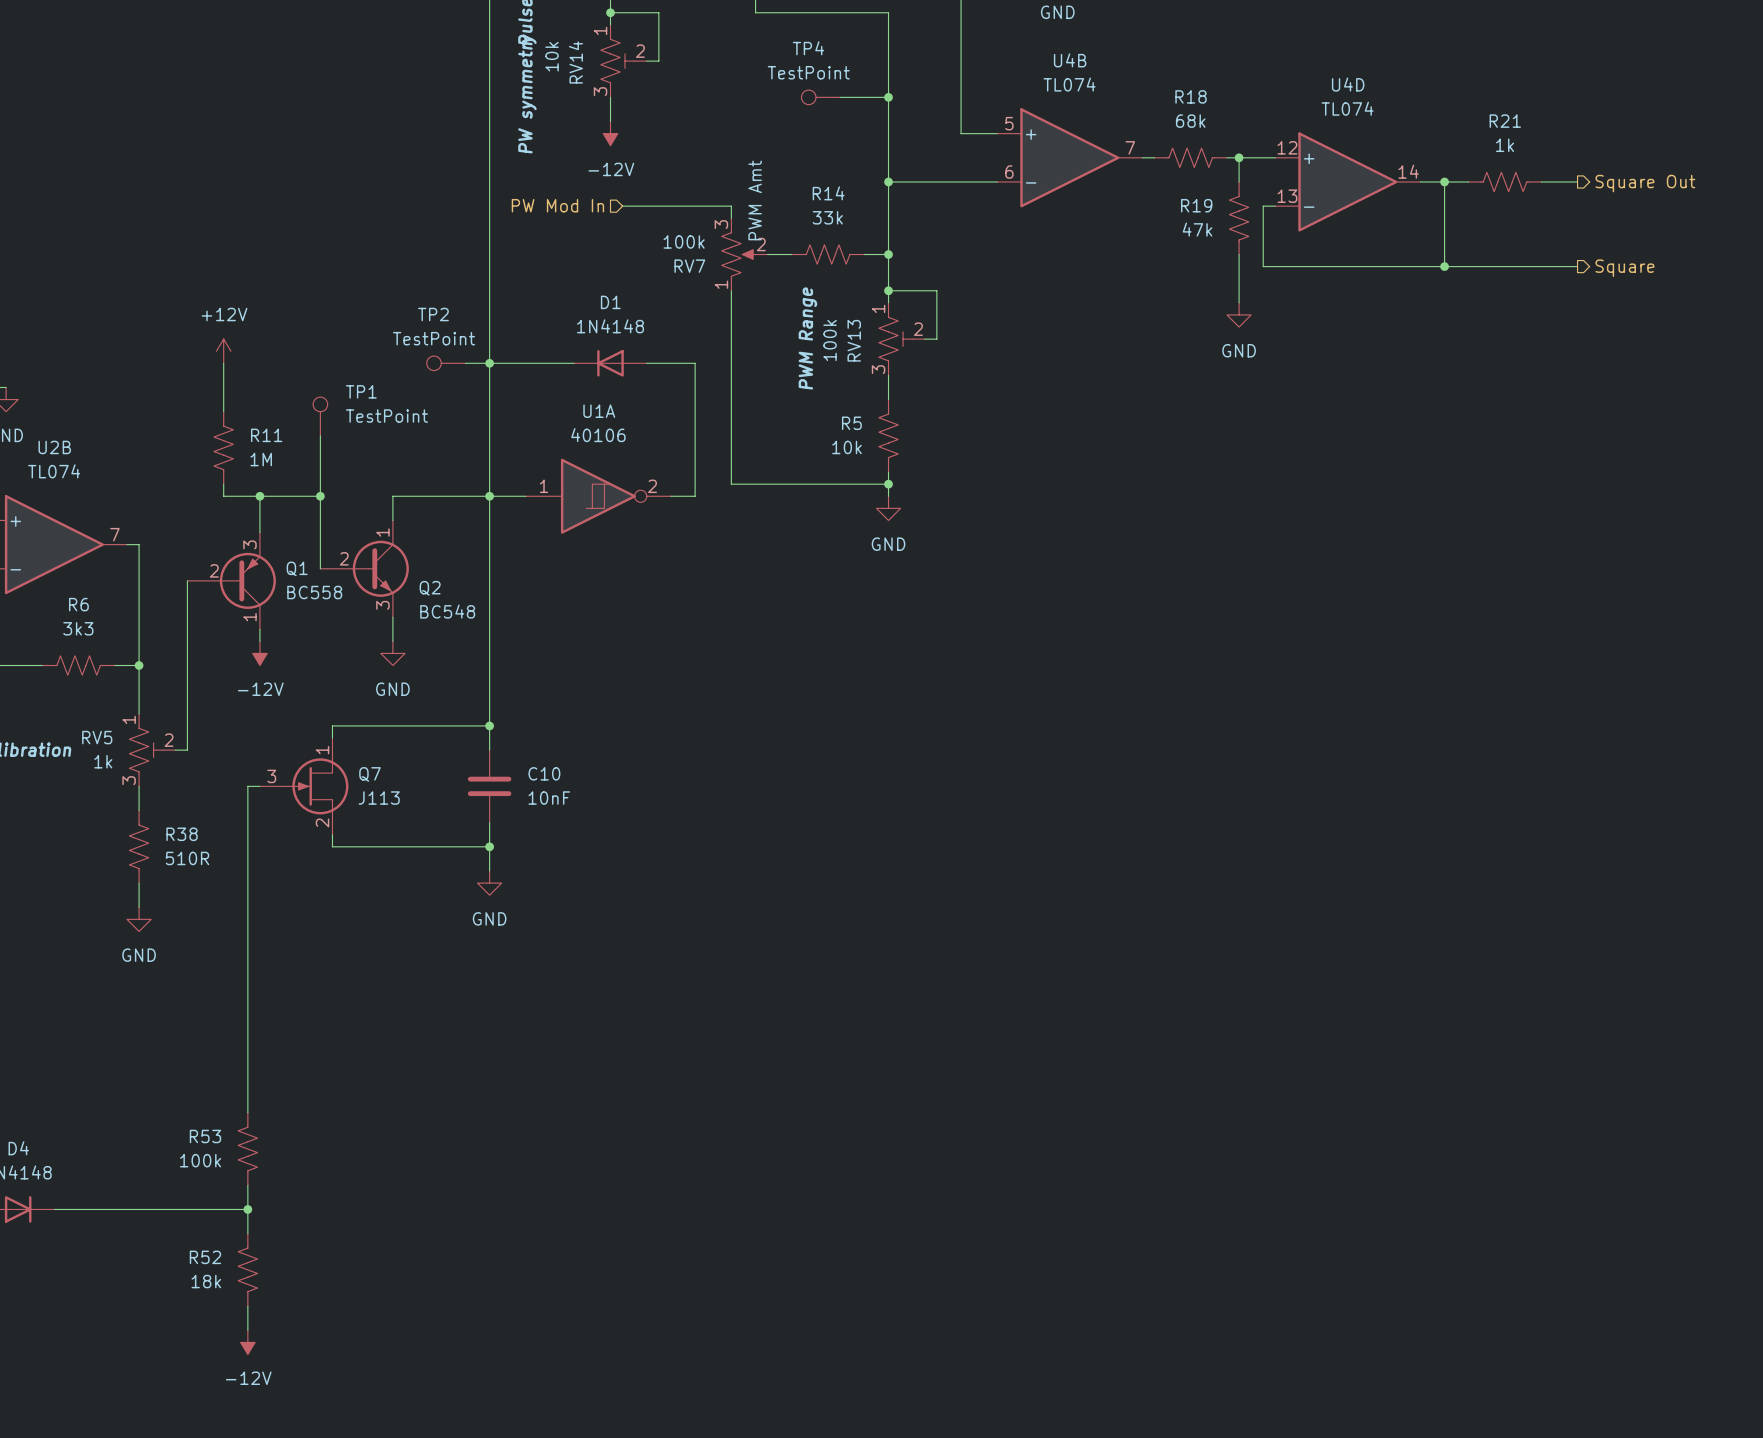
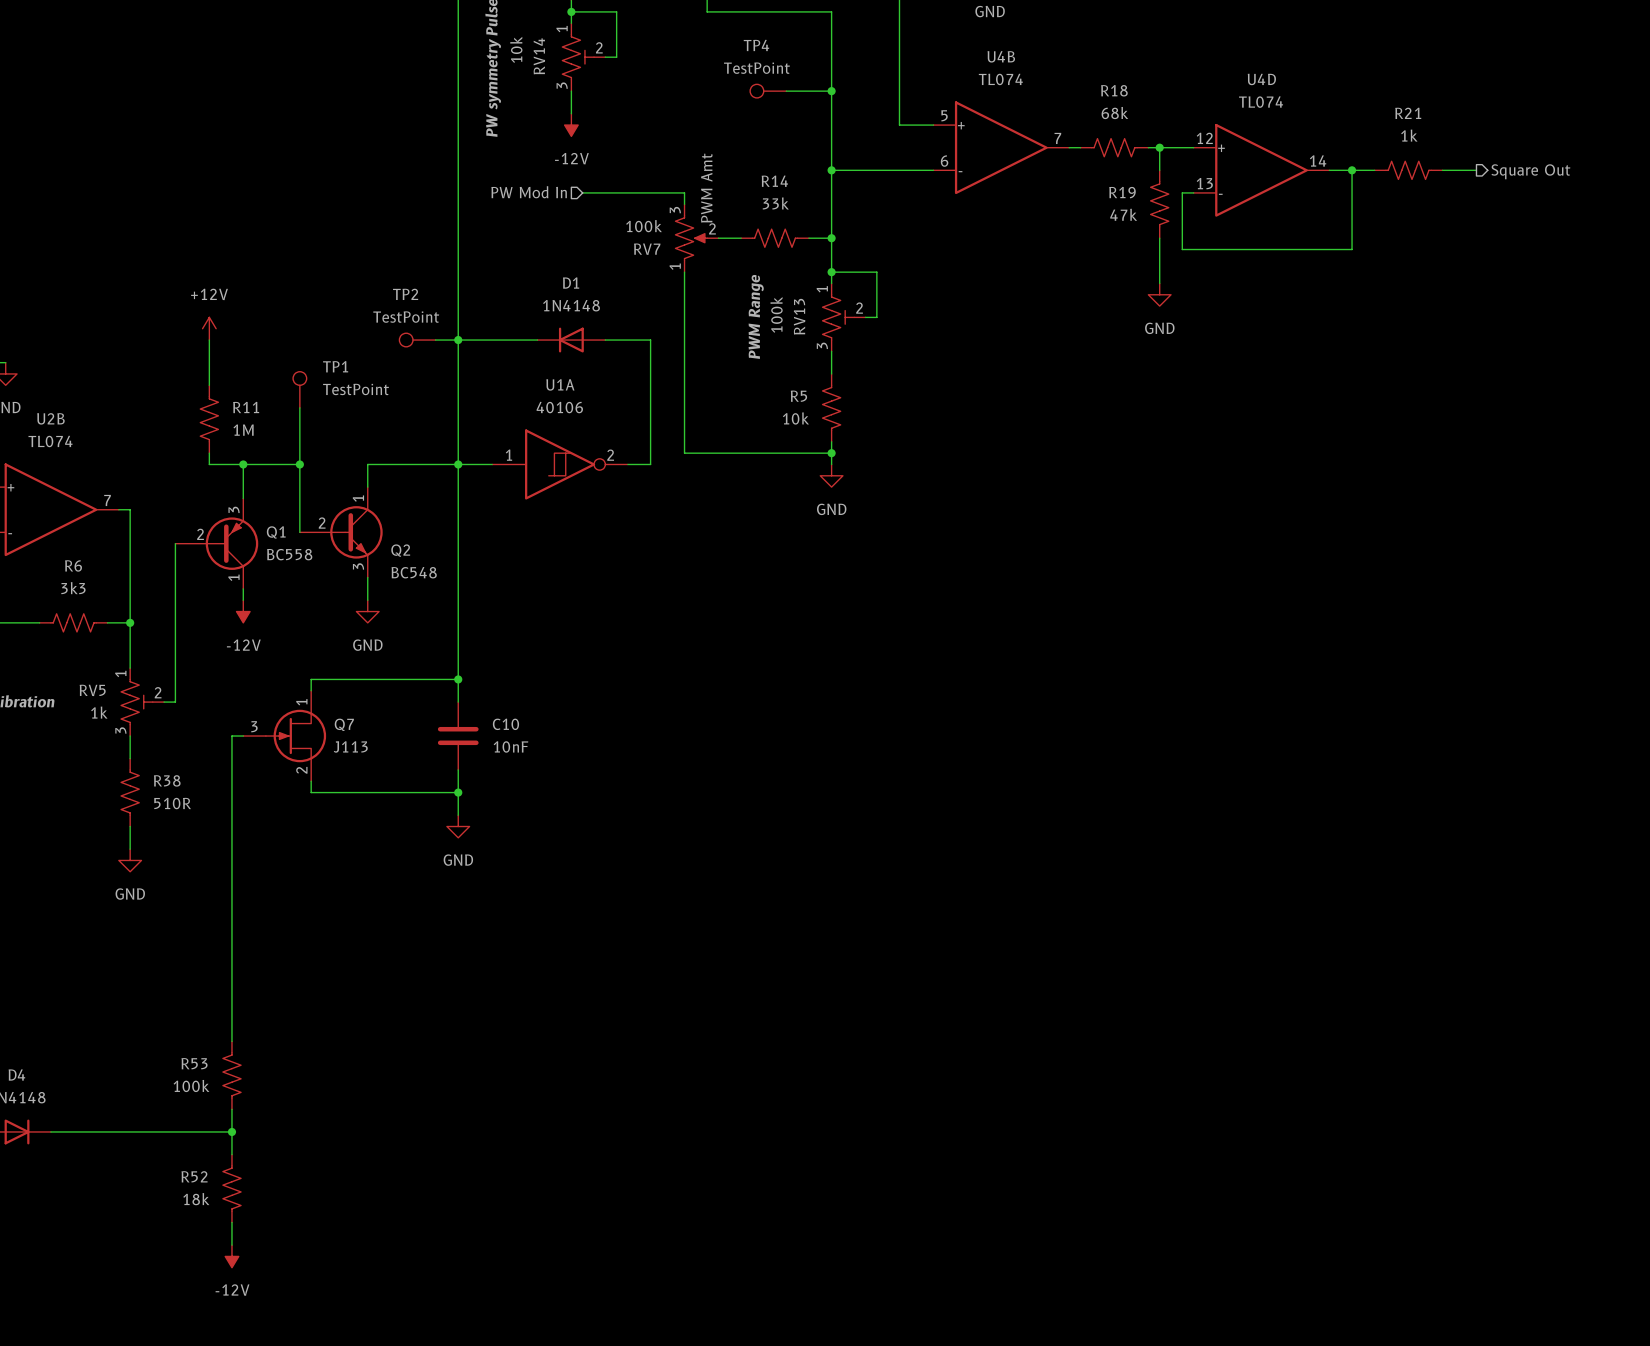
wire: (1444, 266) (1577, 266) -> none
junction: (1444, 266) -> none
hierarchical label: Square (1624, 268) -> none

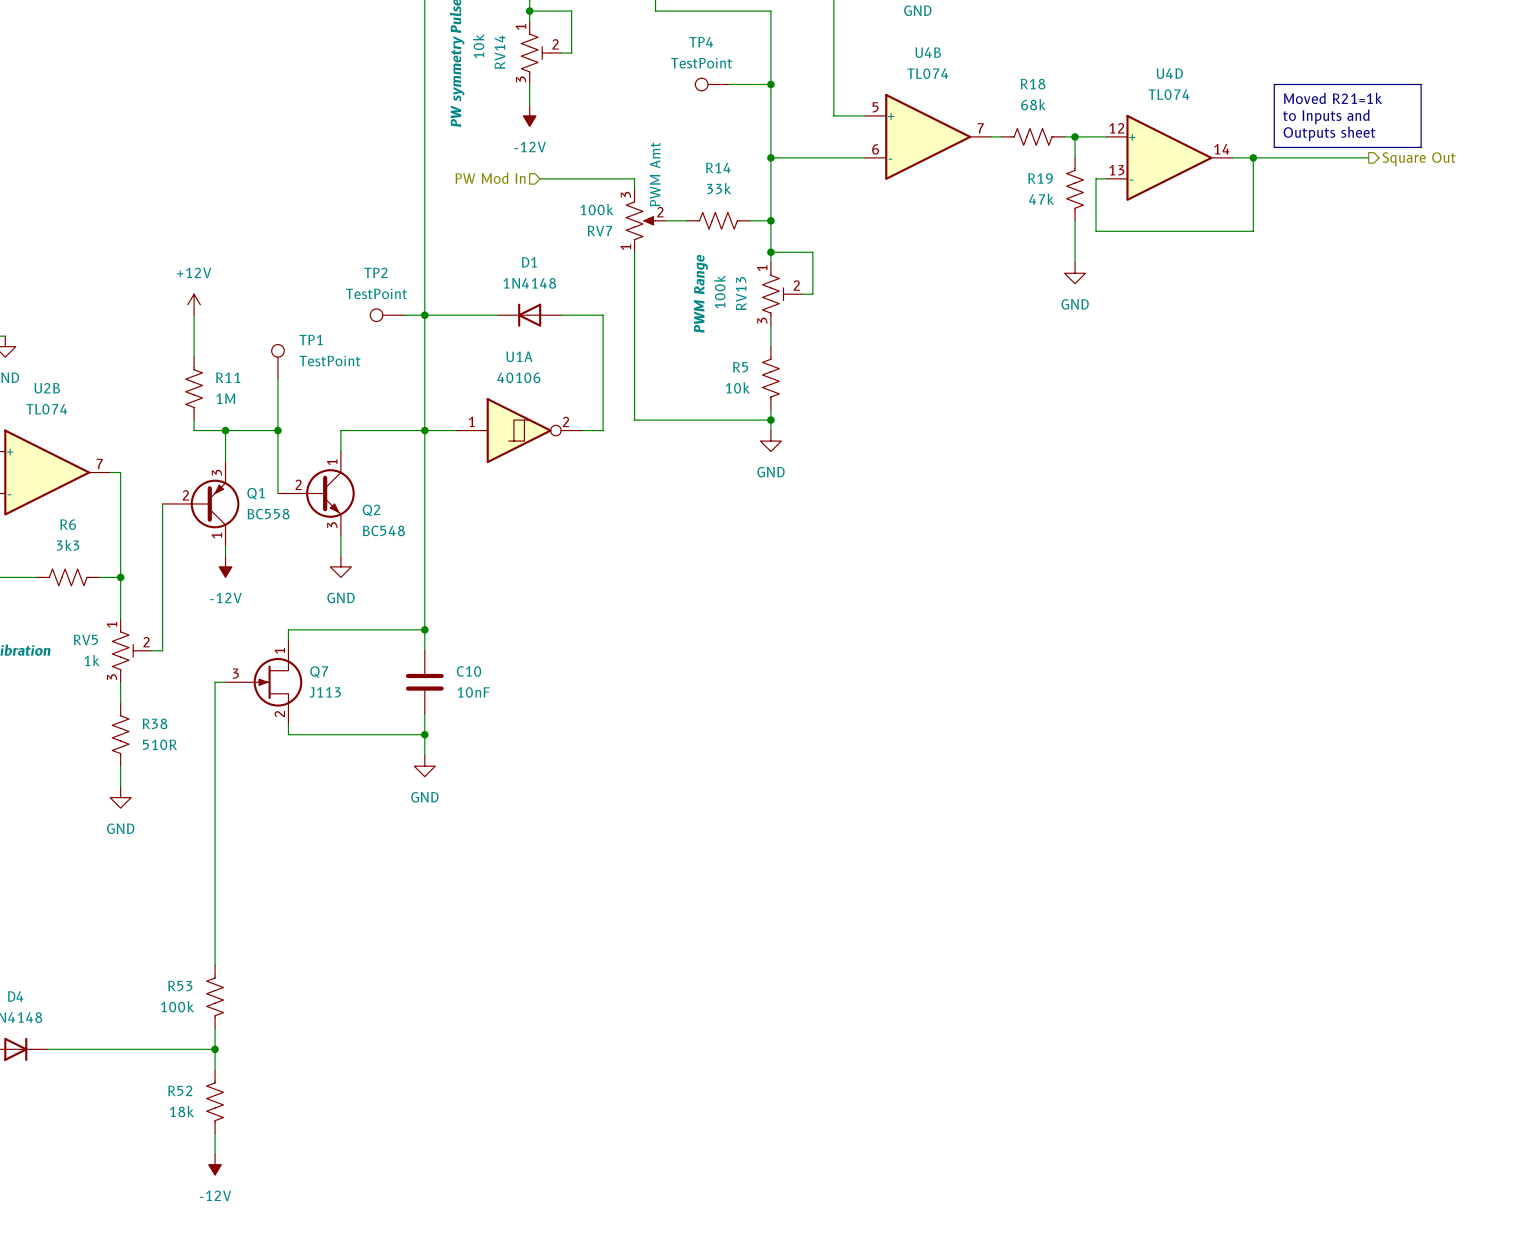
line: none -> (1274, 84) (1421, 84) (1421, 147) (1274, 147) (1274, 84)
text: none -> Moved R21=1k (1333, 98)
text: none -> to Inputs and (1326, 116)
text: none -> Outputs sheet (1329, 133)
R21: 1k (1408, 170) -> none

